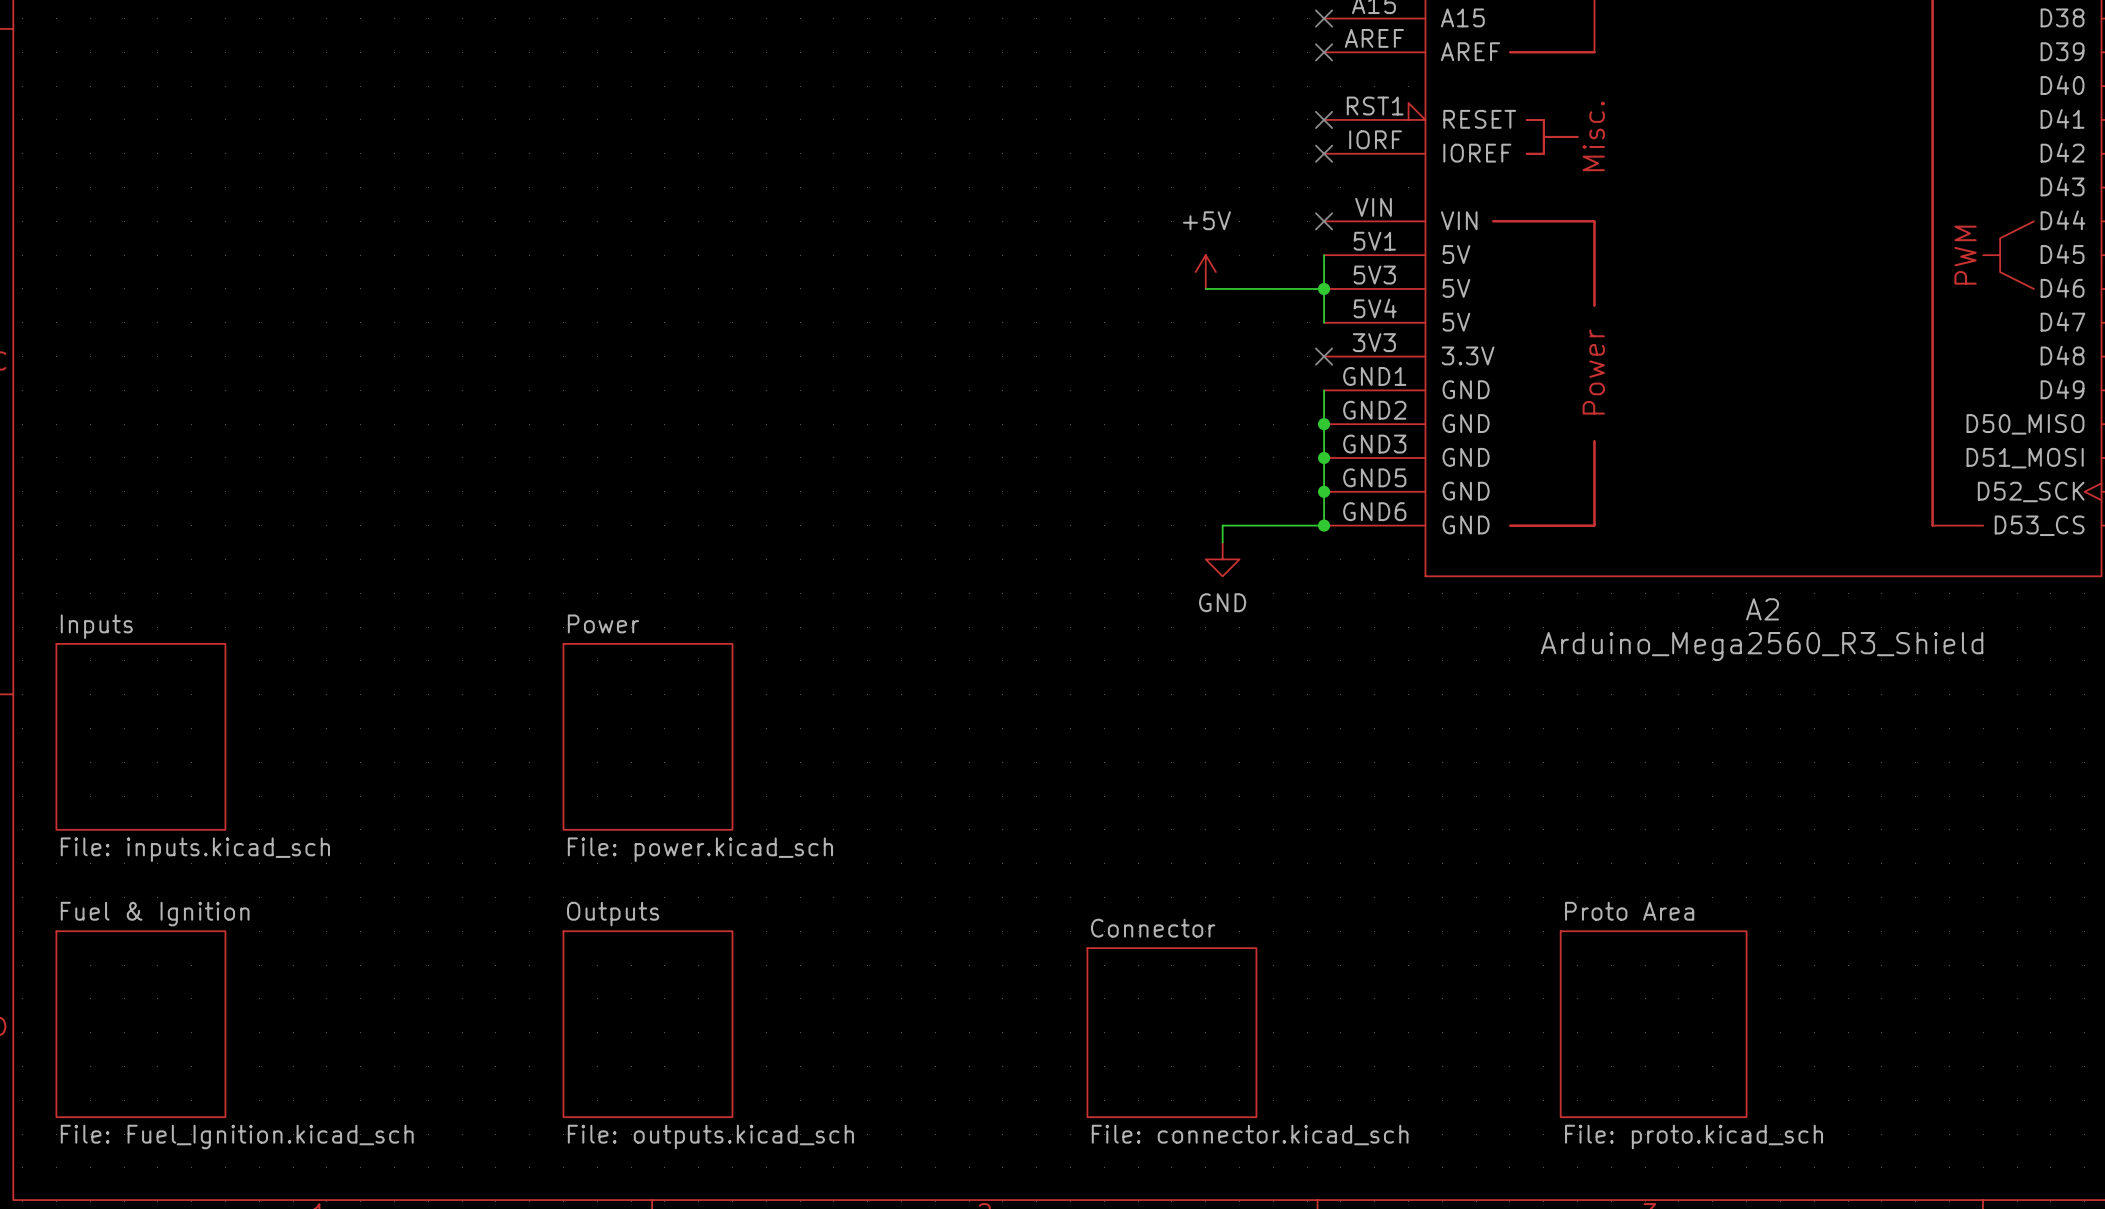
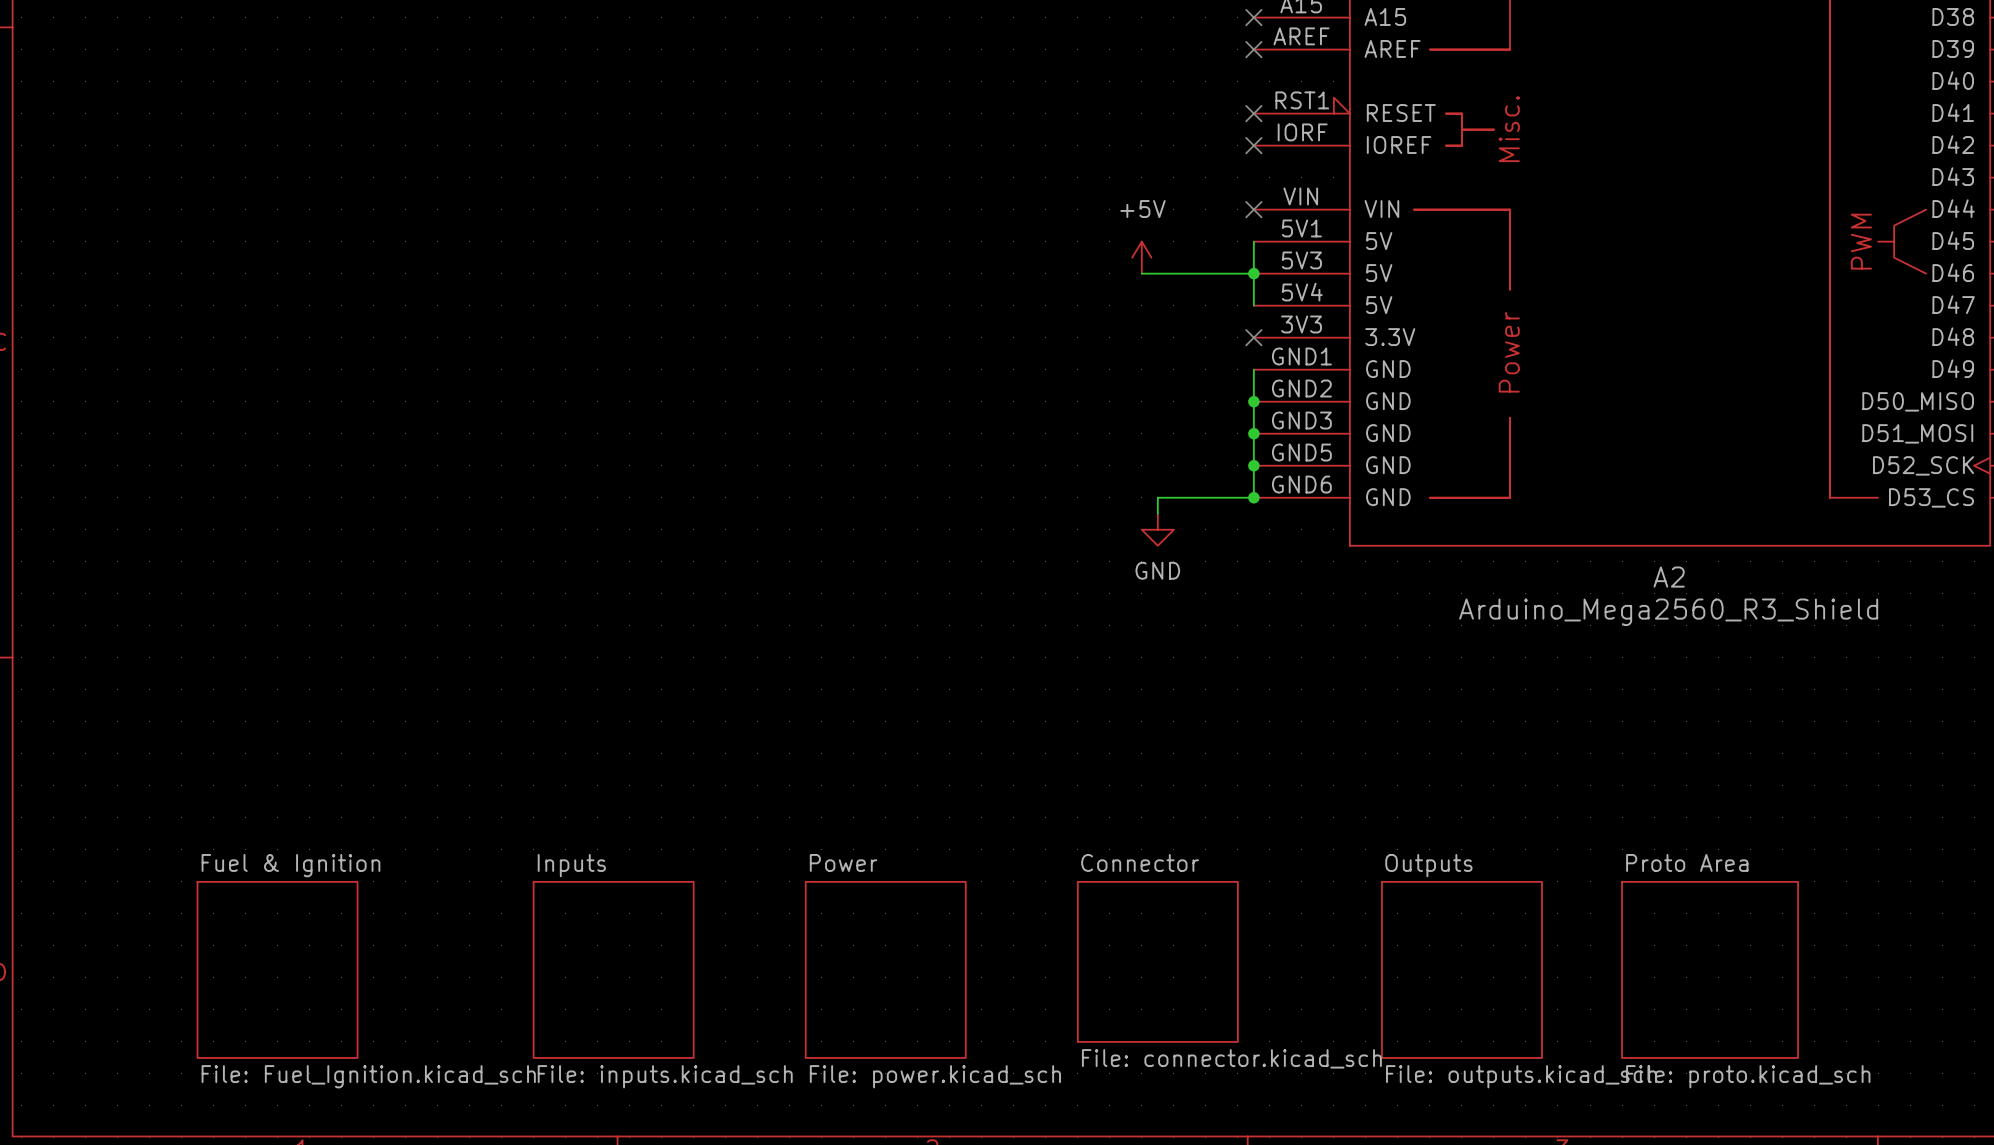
sheet Inputs: File: inputs.kicad_sch (140, 736) -> none
sheet Power: File: power.kicad_sch (647, 736) -> none
sheet Outputs name: Outputs (613, 914) -> Inputs (571, 865)
sheet Fuel & Ignition position: (140, 1024) -> (277, 969)
sheet Power: none -> File: power.kicad_sch (885, 969)
sheet Outputs: none -> File: outputs.kicad_sch (1461, 969)
sheet Proto Area position: (1653, 1024) -> (1710, 969)
sheet Connector position: (1171, 1032) -> (1157, 961)
sheet Outputs value: File: outputs.kicad_sch (710, 1137) -> File: inputs.kicad_sch (665, 1076)

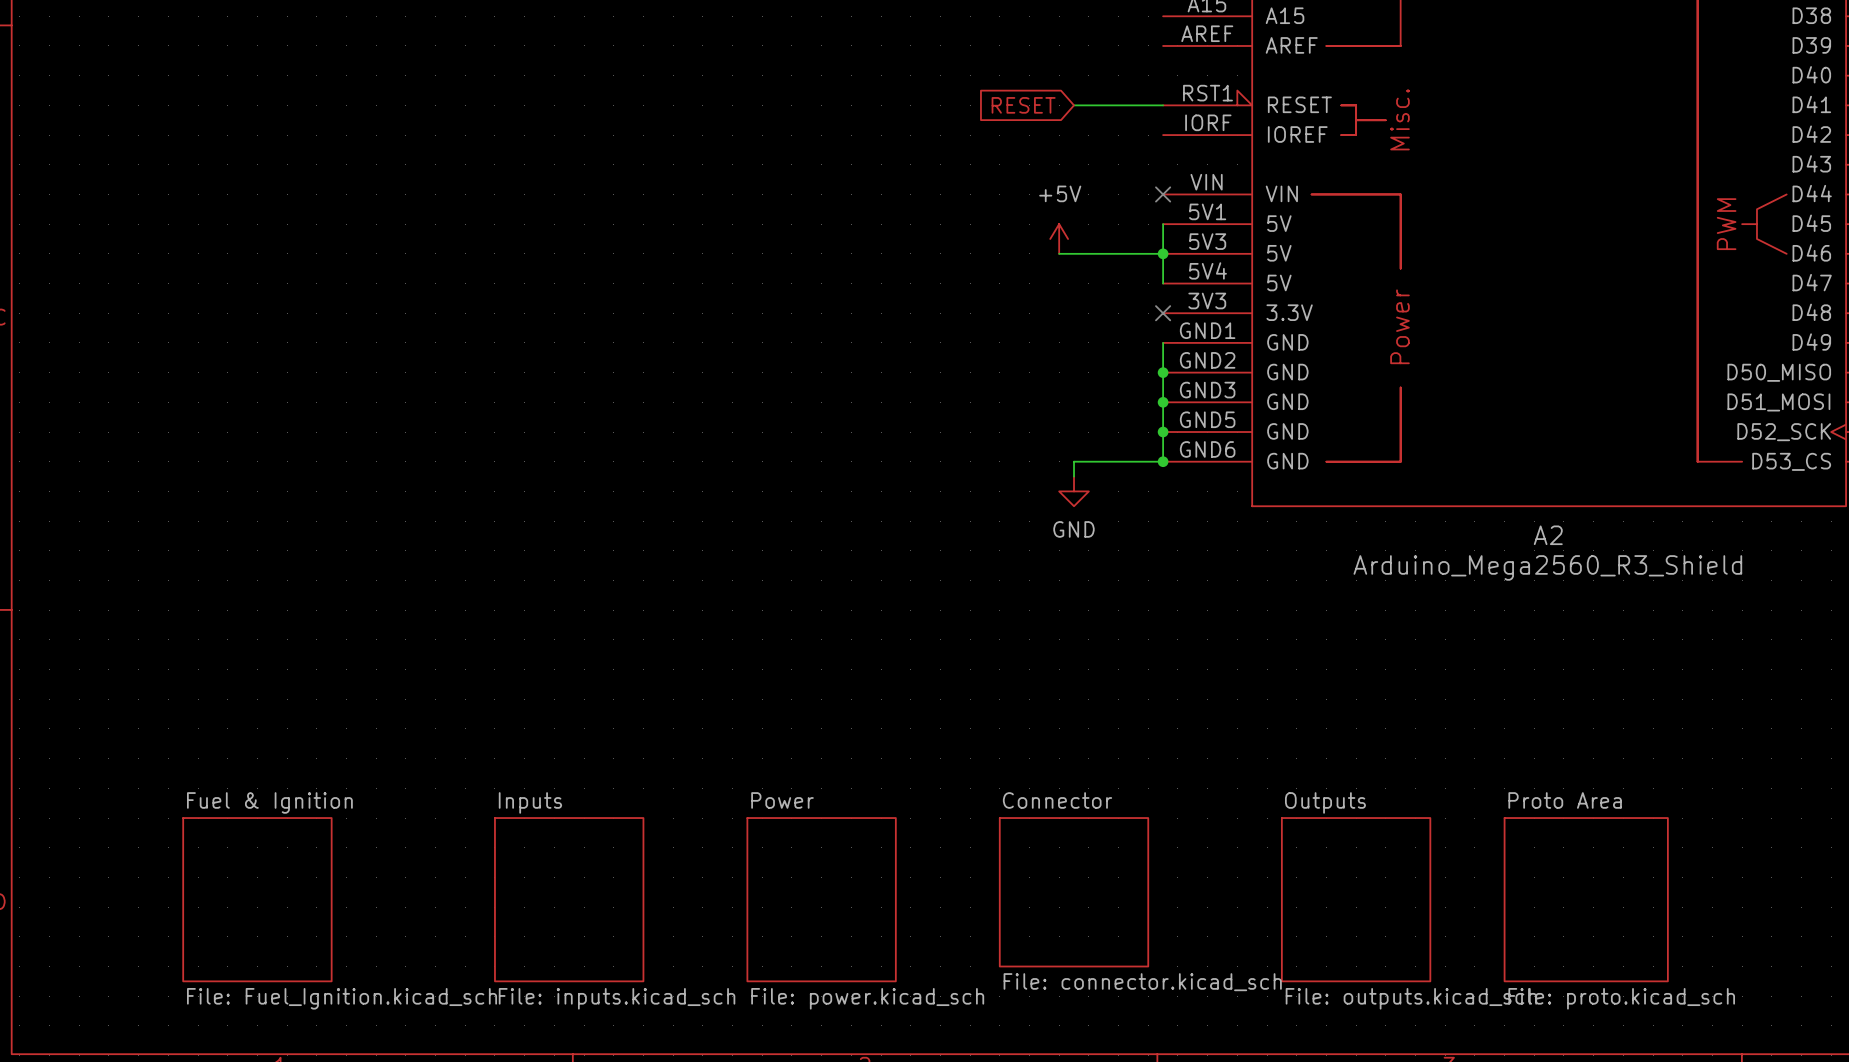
no-connect mark: (1253, 17) -> none
no-connect mark: (1253, 49) -> none
global label: none -> RESET (1023, 105)
wire: none -> (1074, 105) (1163, 105)
no-connect mark: (1253, 113) -> none
no-connect mark: (1253, 145) -> none

